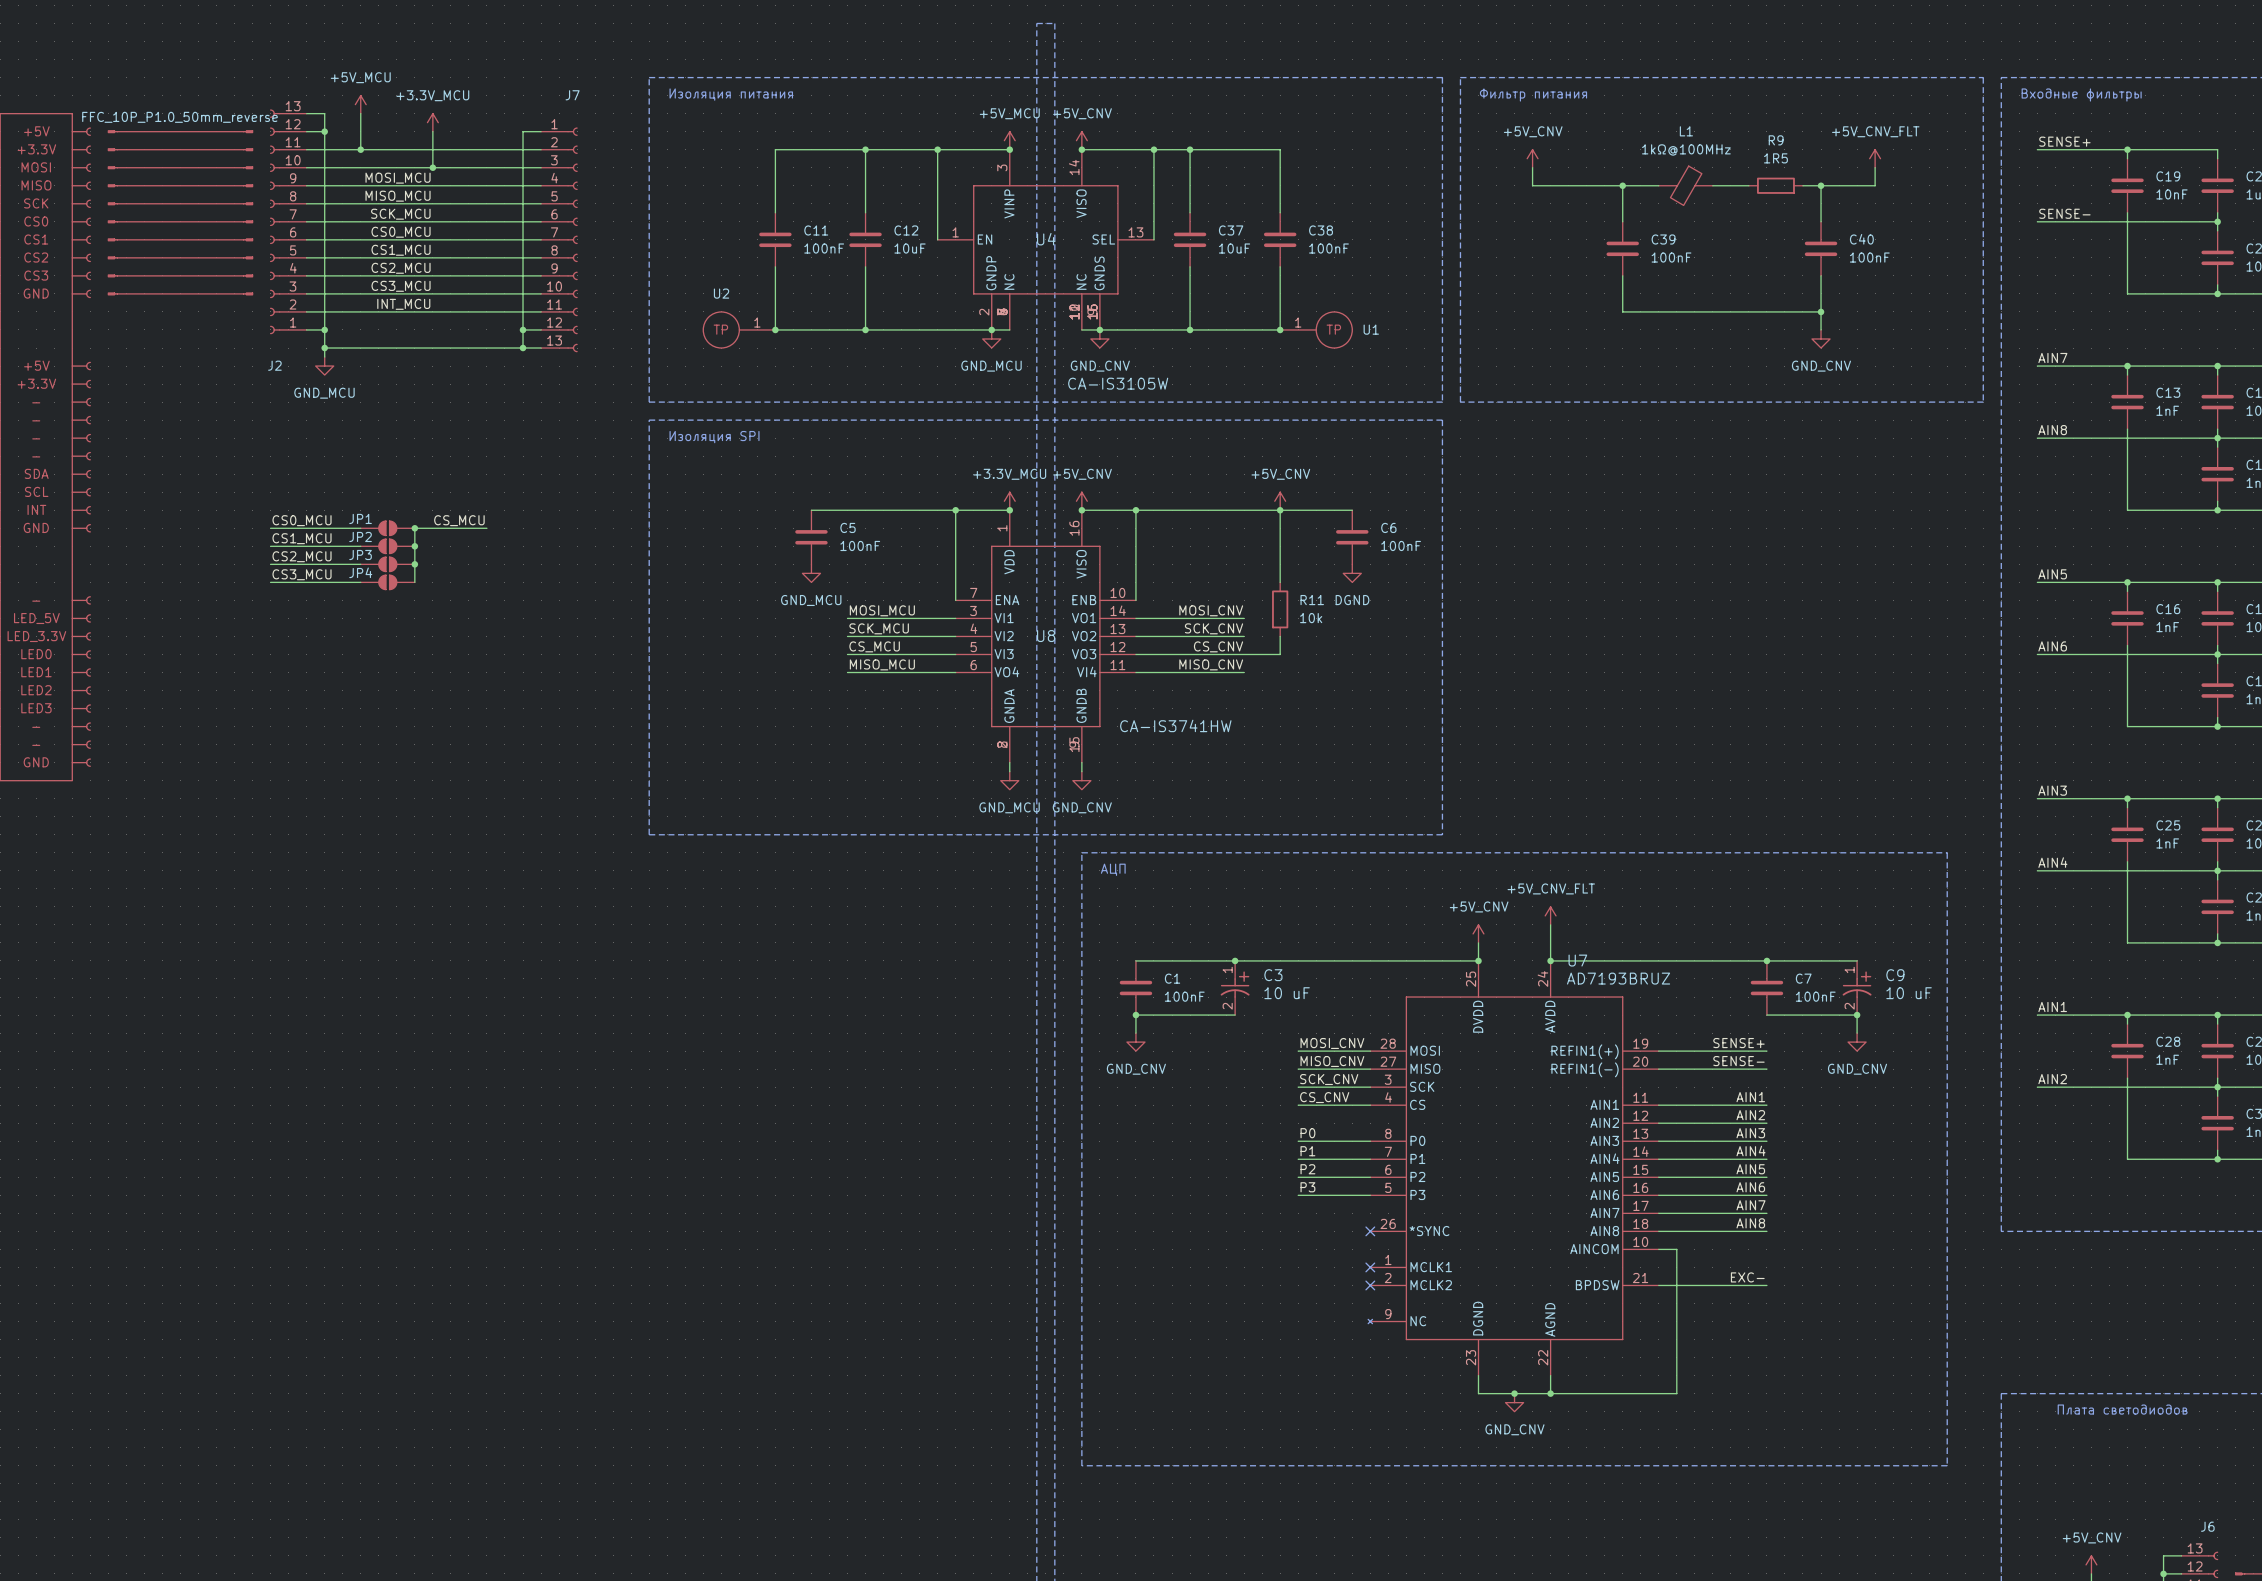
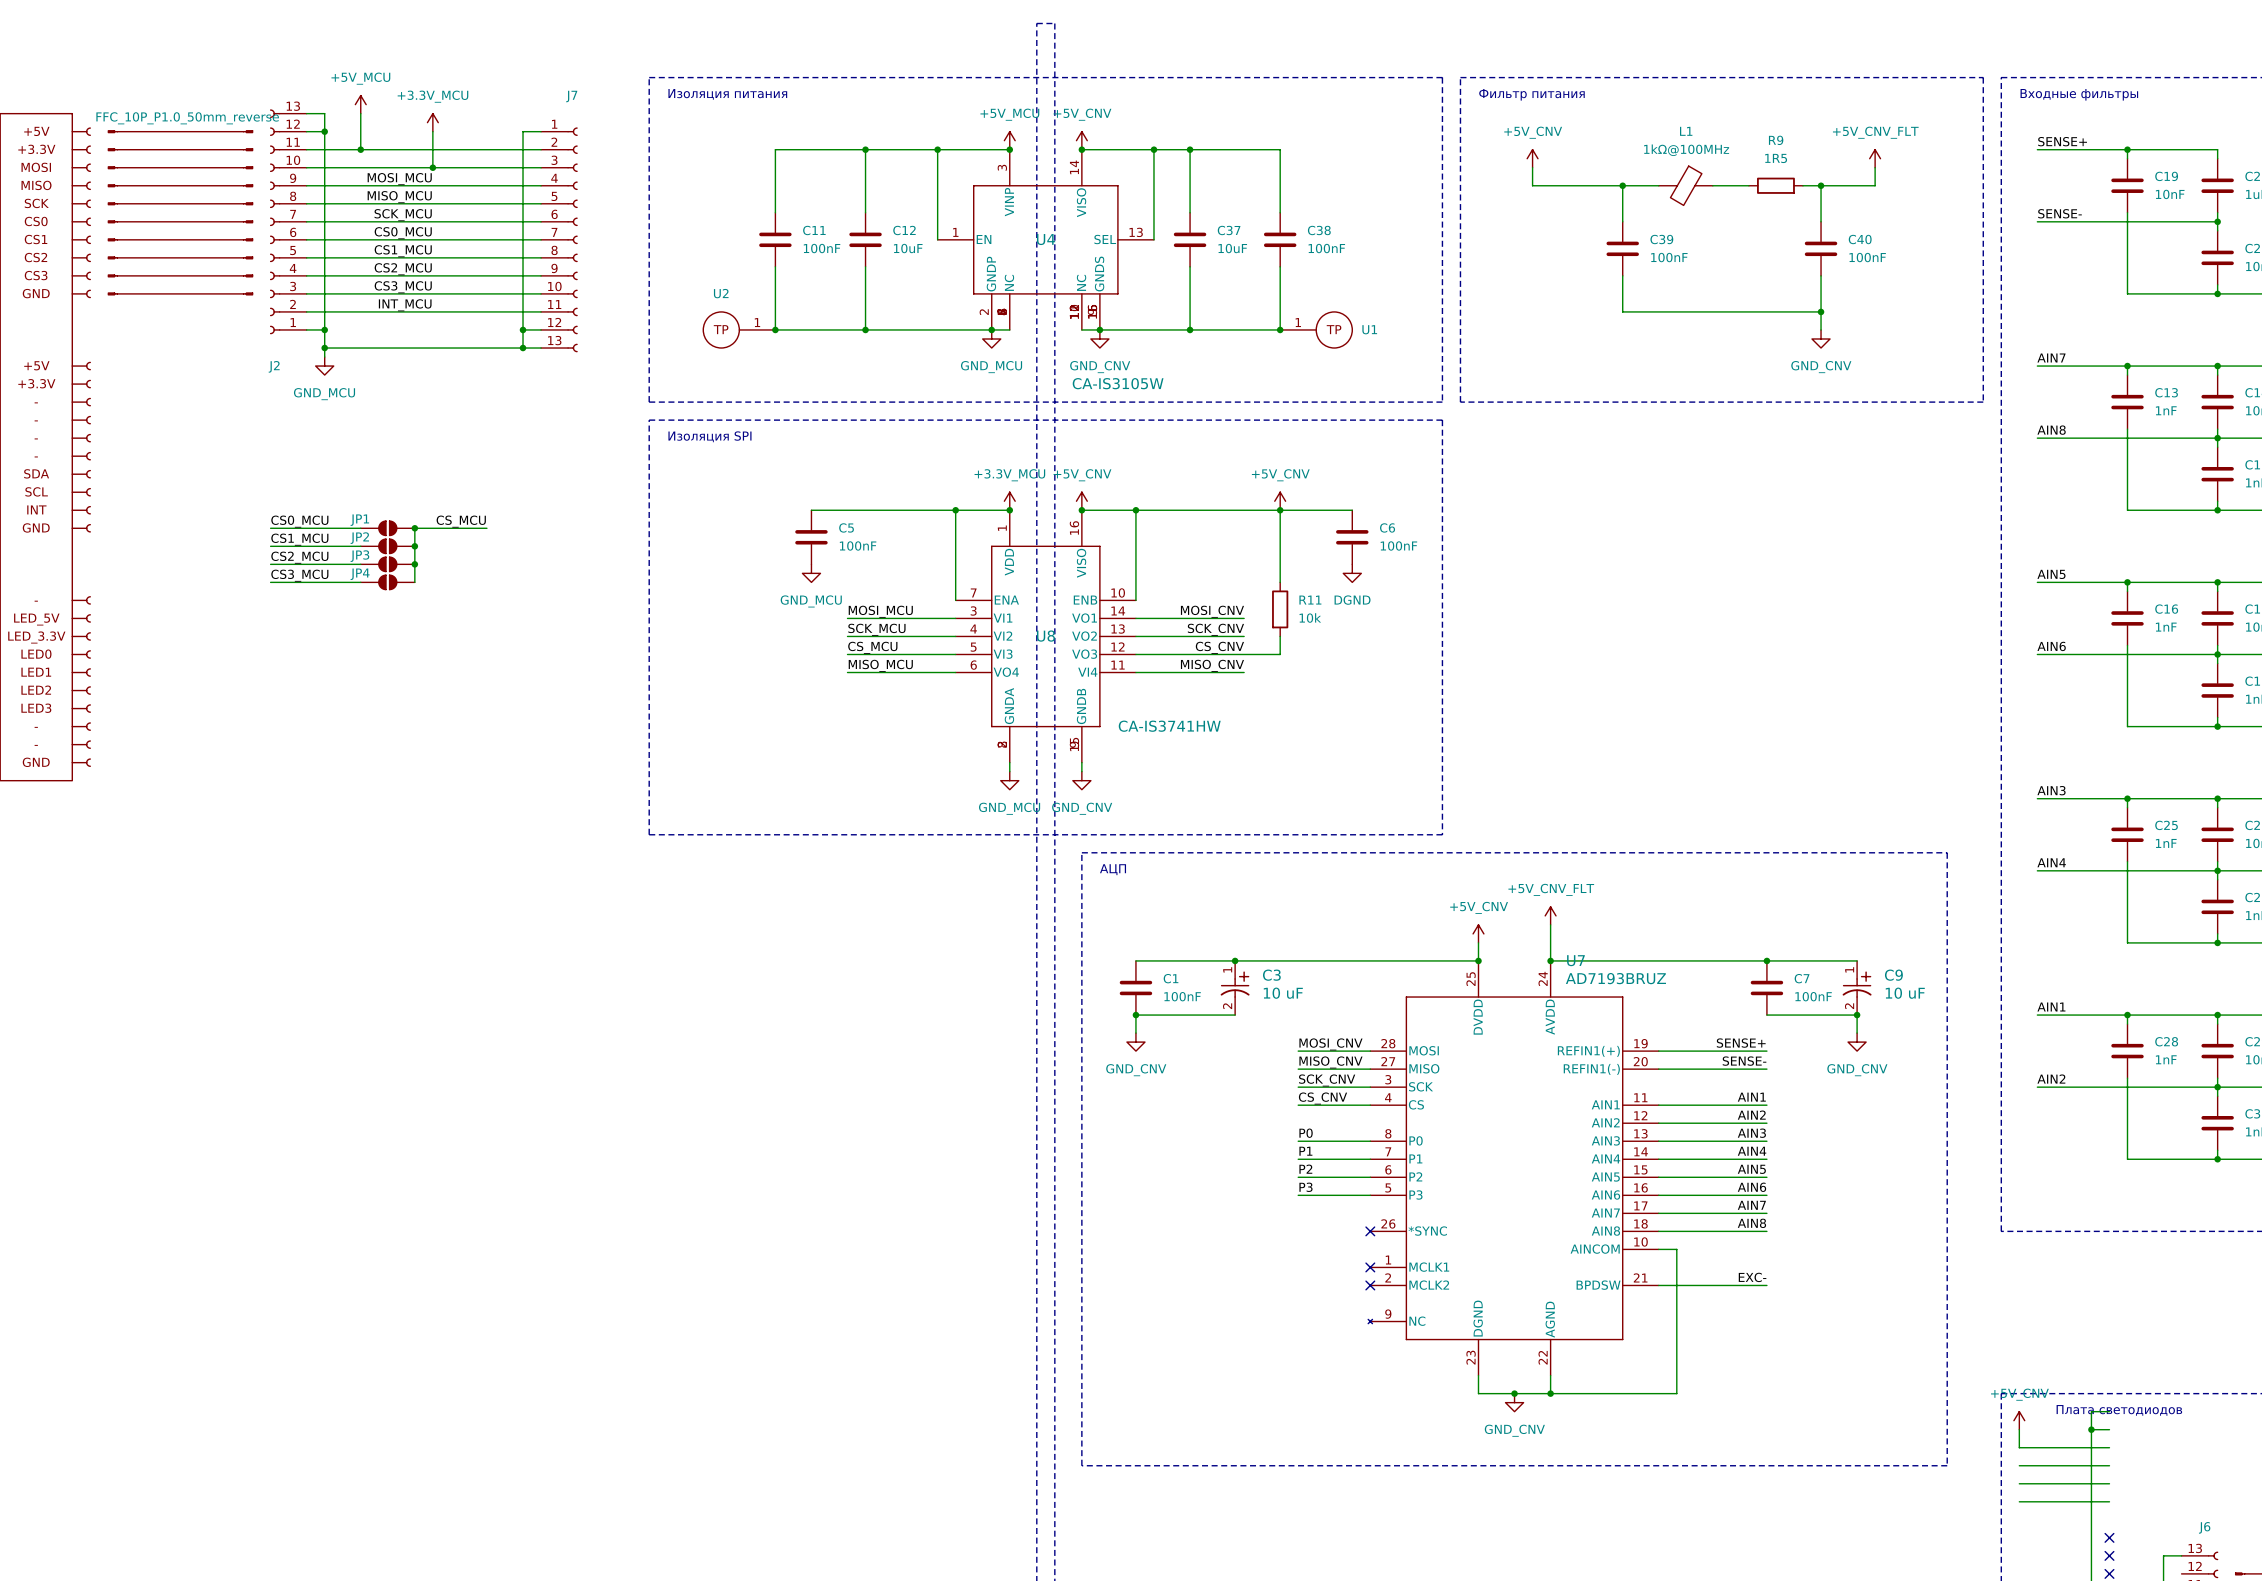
wire: none -> (2109, 1411) (2091, 1411) (2091, 1573)
power symbol: none -> +5V_CNV (2019, 1420)
wire: none -> (2019, 1429) (2019, 1447) (2109, 1447)
junction: none -> (2091, 1429)
wire: none -> (2019, 1465) (2109, 1465)
wire: none -> (2019, 1483) (2109, 1483)
wire: none -> (2019, 1501) (2109, 1501)
no-connect mark: none -> (2109, 1537)
no-connect mark: none -> (2109, 1555)
power symbol: +5V_CNV (2091, 1564) -> none
no-connect mark: none -> (2109, 1573)
wire: (2163, 1573) (2181, 1573) -> (2091, 1429) (2109, 1429)
junction: (2163, 1573) -> none

